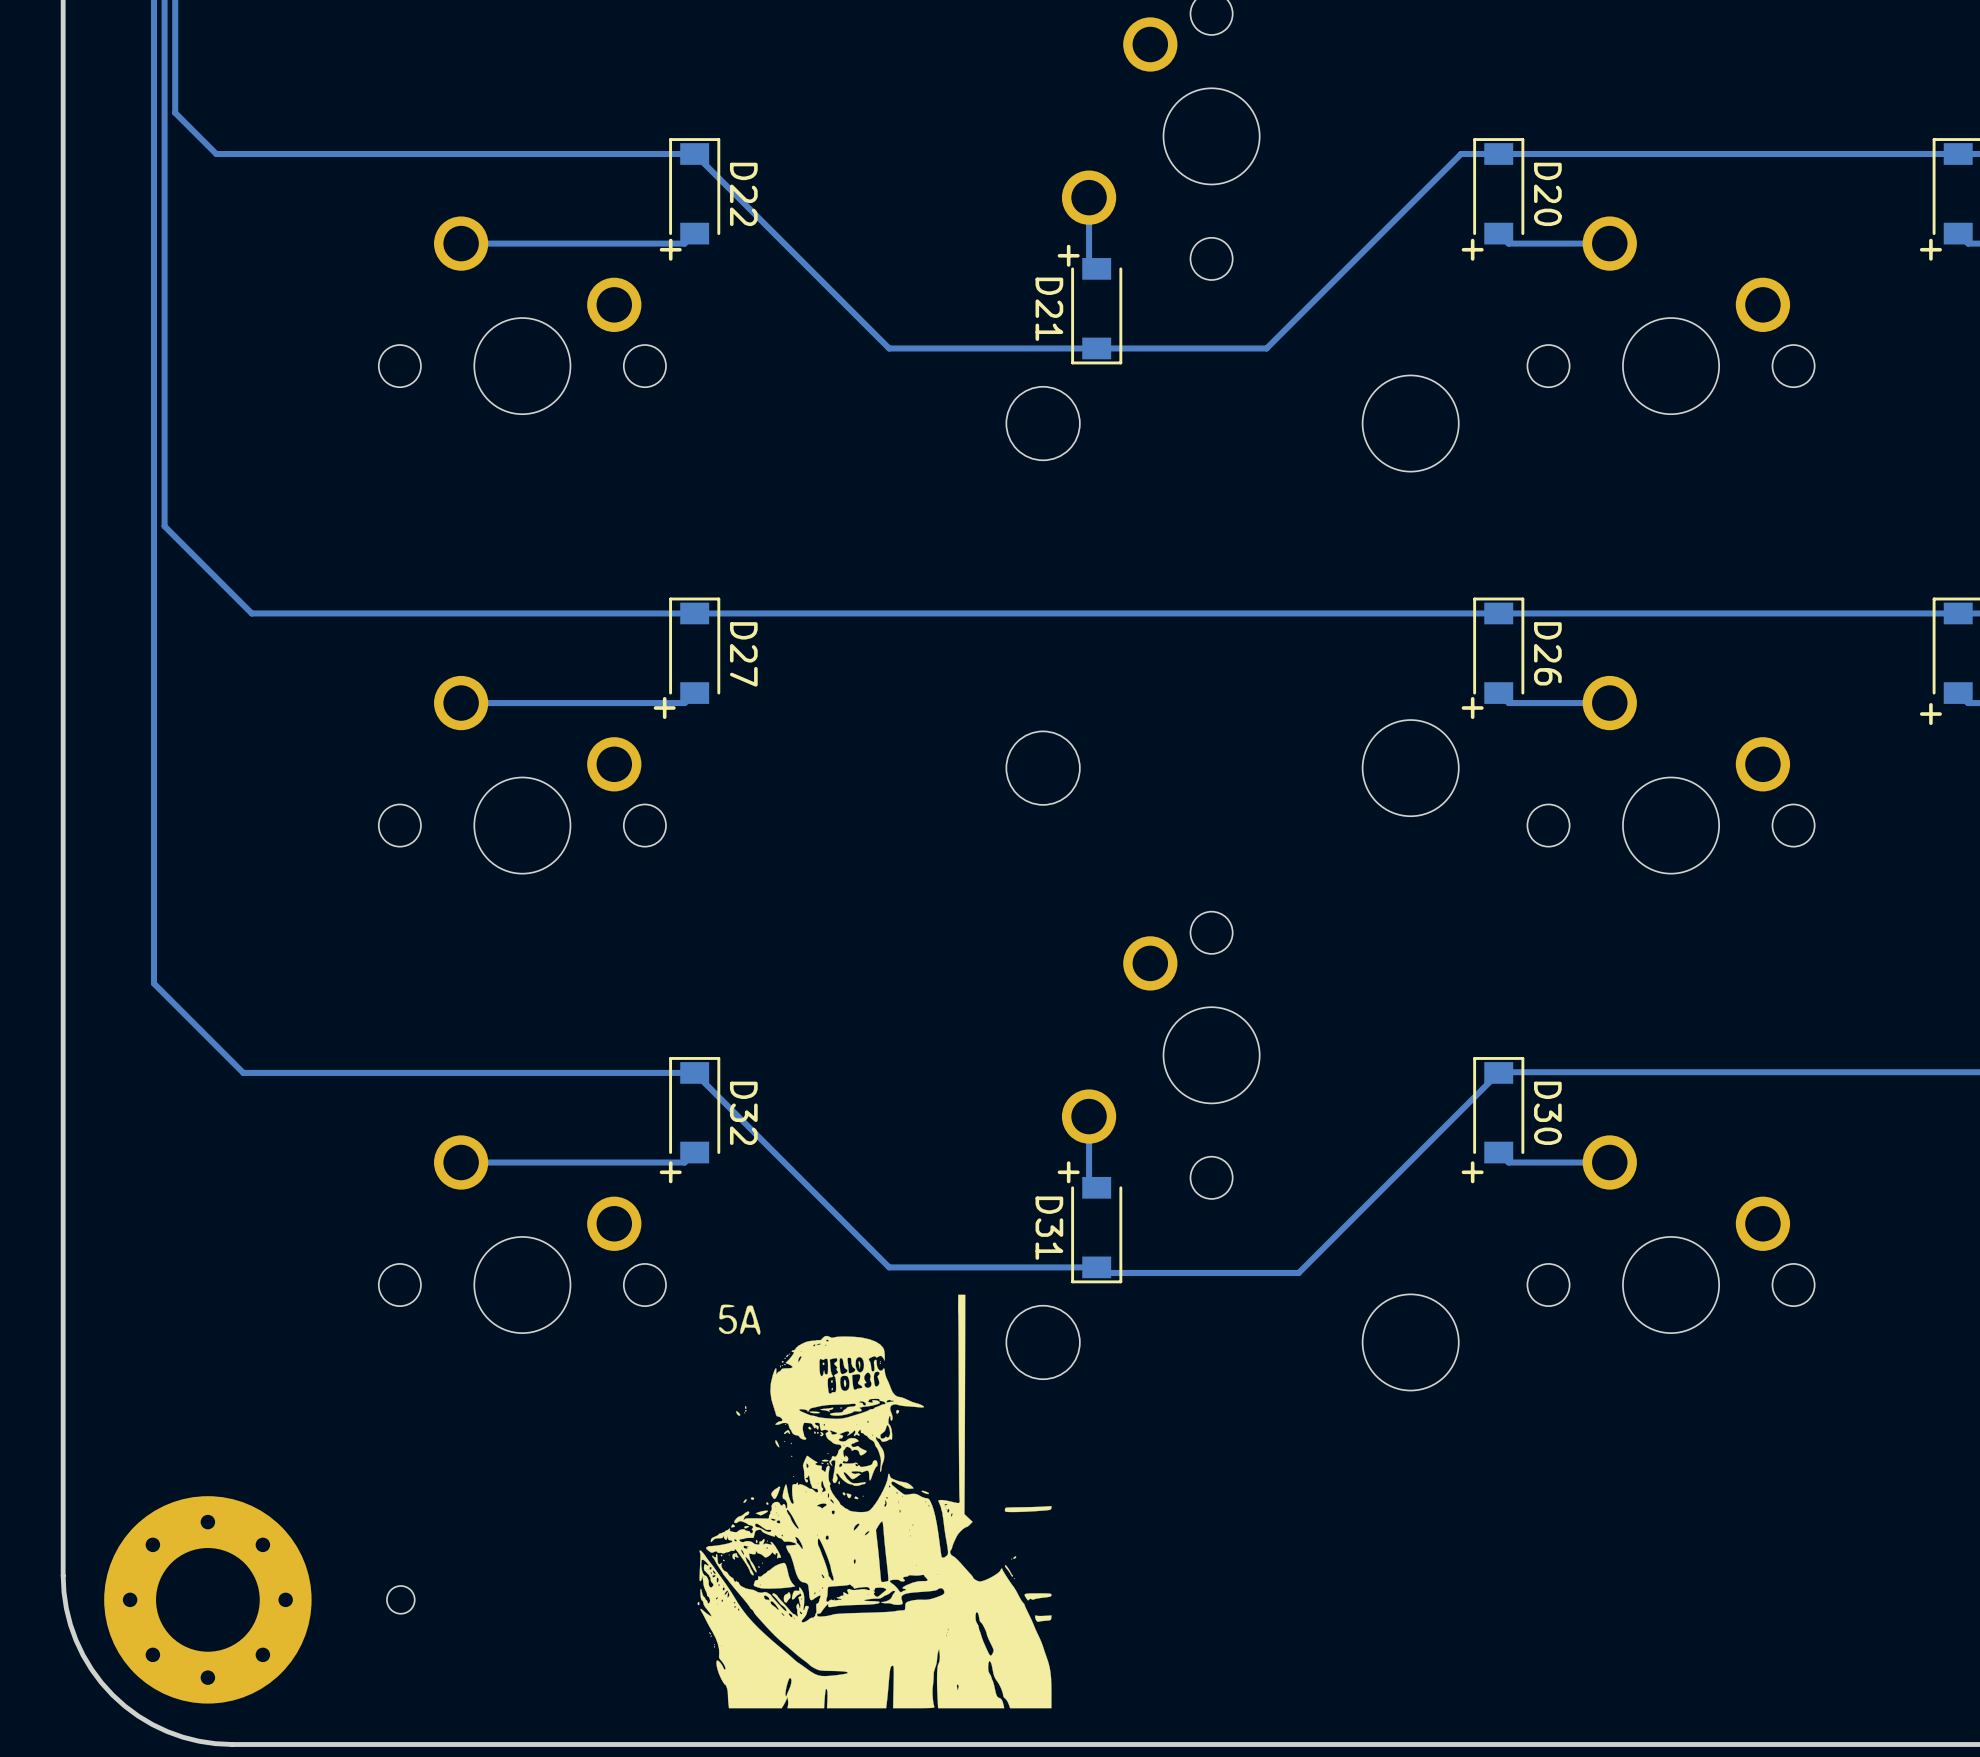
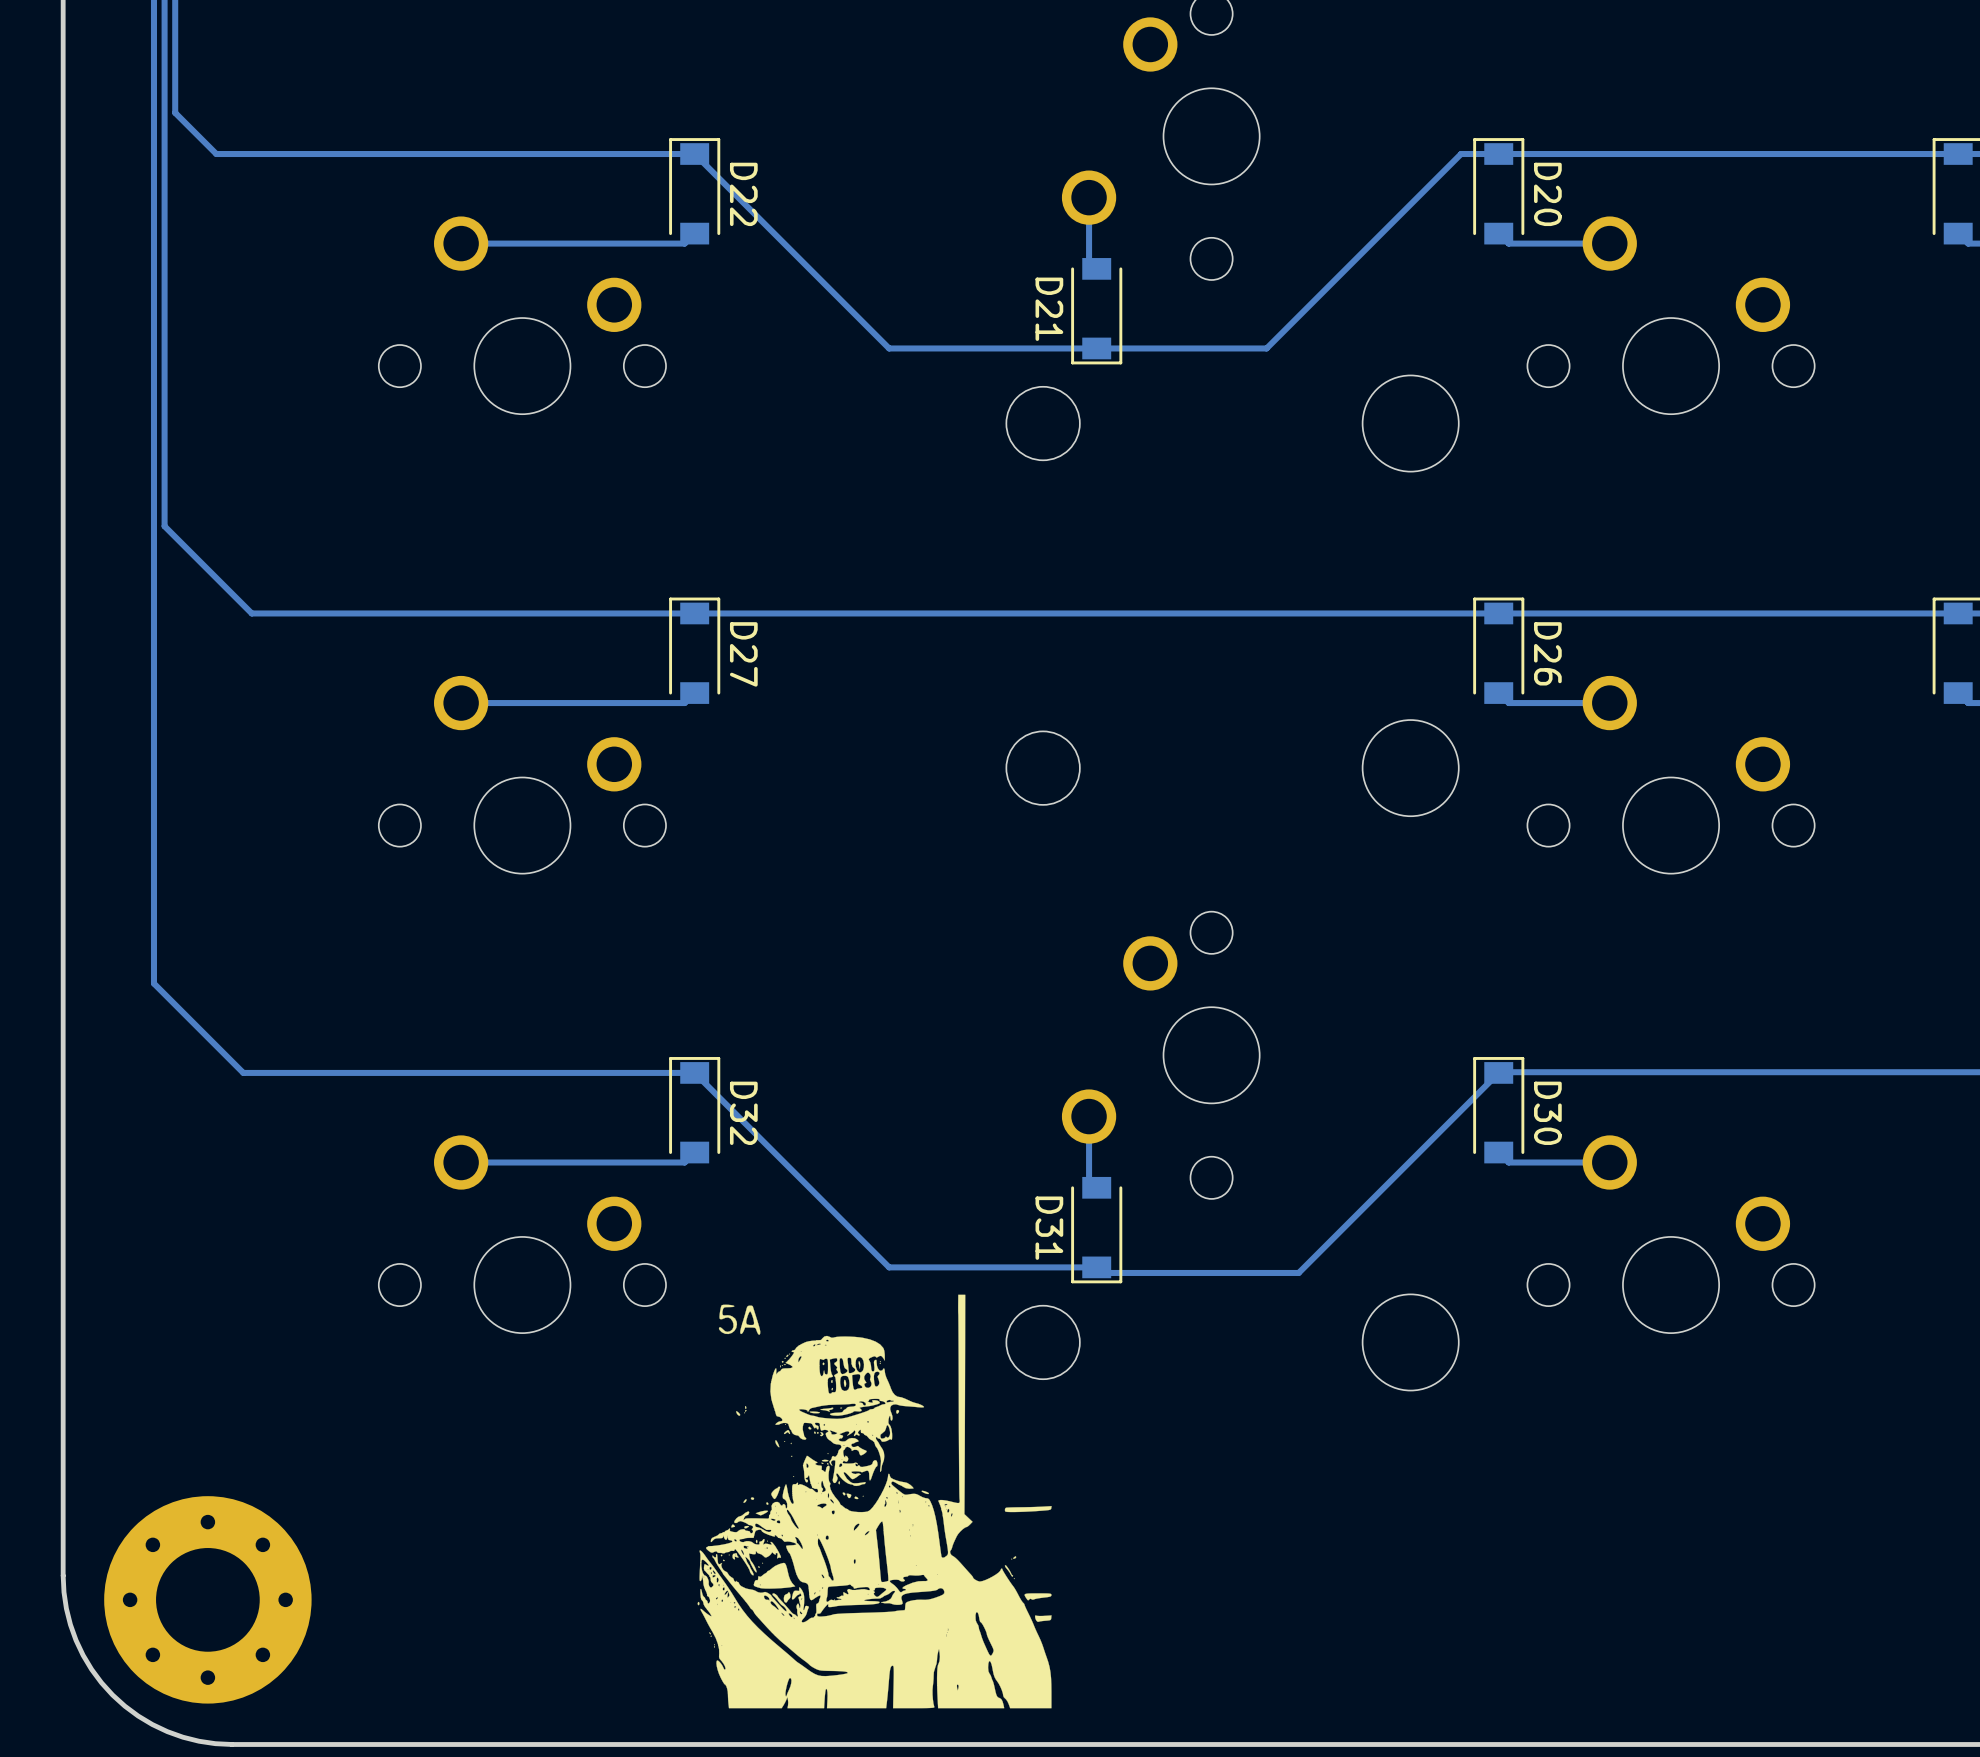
text: + (670, 249) -> none
text: + (1472, 249) -> none
text: + (1930, 249) -> none
text: + (1068, 255) -> none
text: + (664, 708) -> none
text: + (1472, 708) -> none
text: + (1930, 714) -> none
text: + (670, 1172) -> none
text: + (1068, 1172) -> none
text: + (1472, 1172) -> none
round board edge: [386, 1585, 416, 1615] -> none

